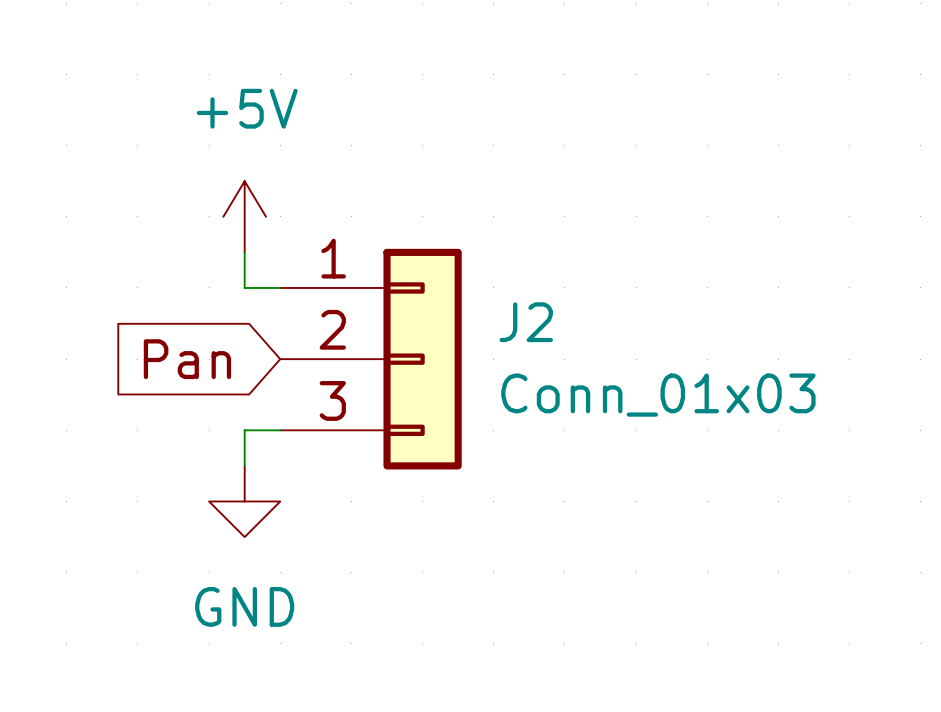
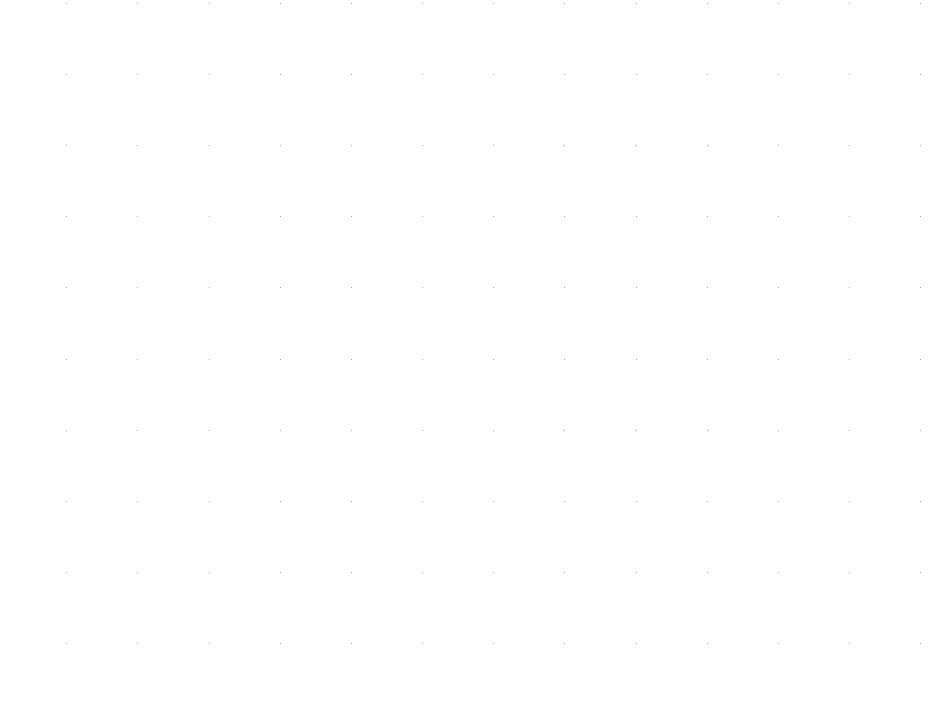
power symbol: +5V (244, 216) -> none
wire: (244, 252) (244, 287) (280, 287) -> none
global label: Pan (187, 359) -> none
J2: Conn_01x03 (371, 359) -> none
wire: (280, 430) (244, 430) (244, 465) -> none
power symbol: GND (244, 501) -> none

